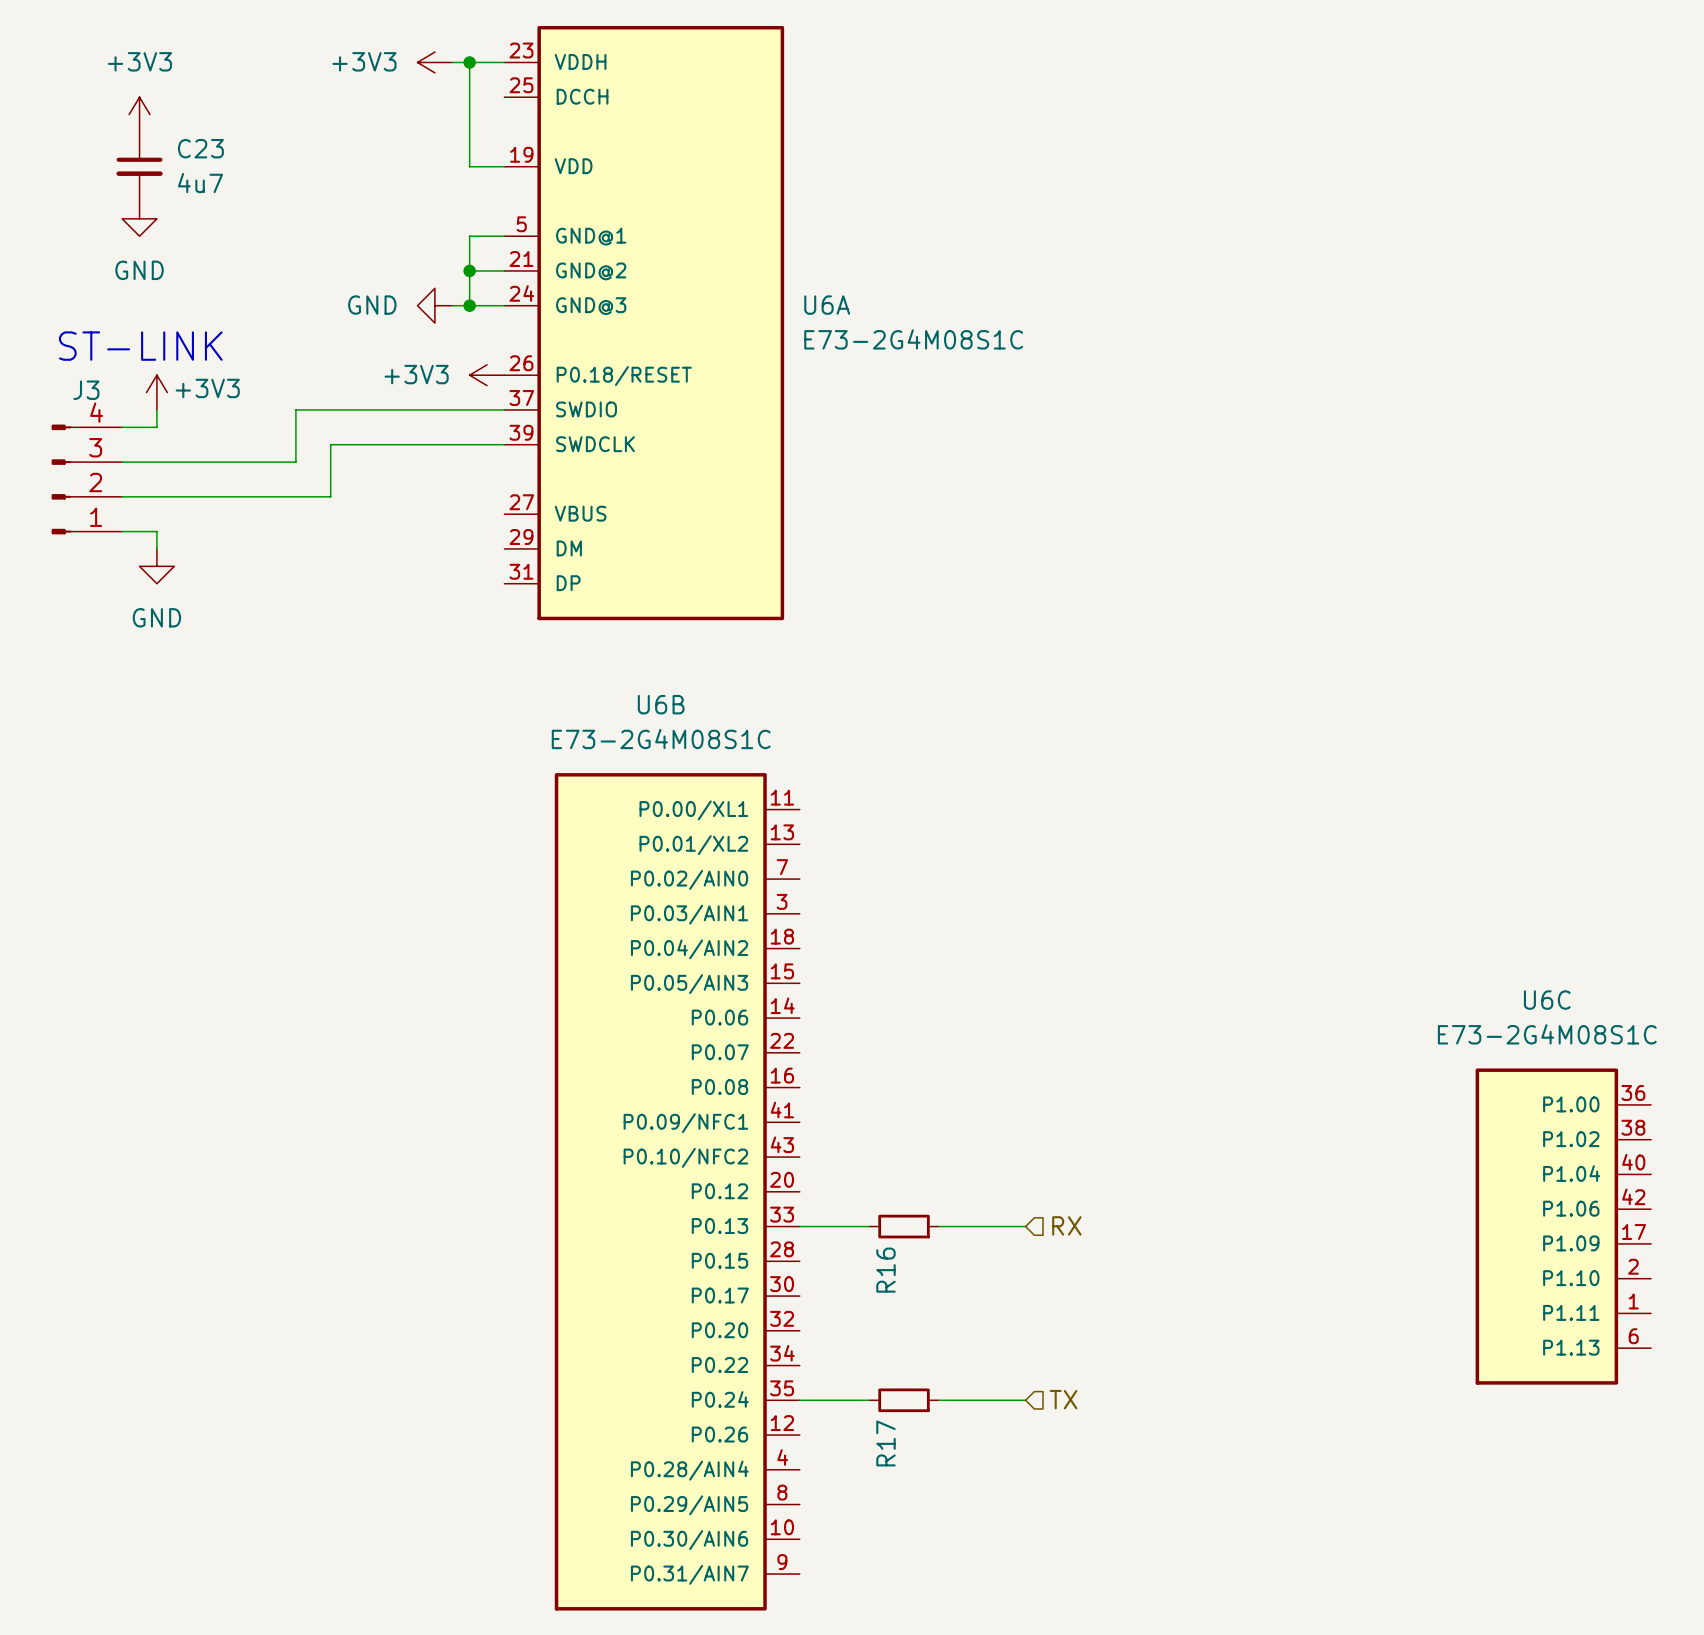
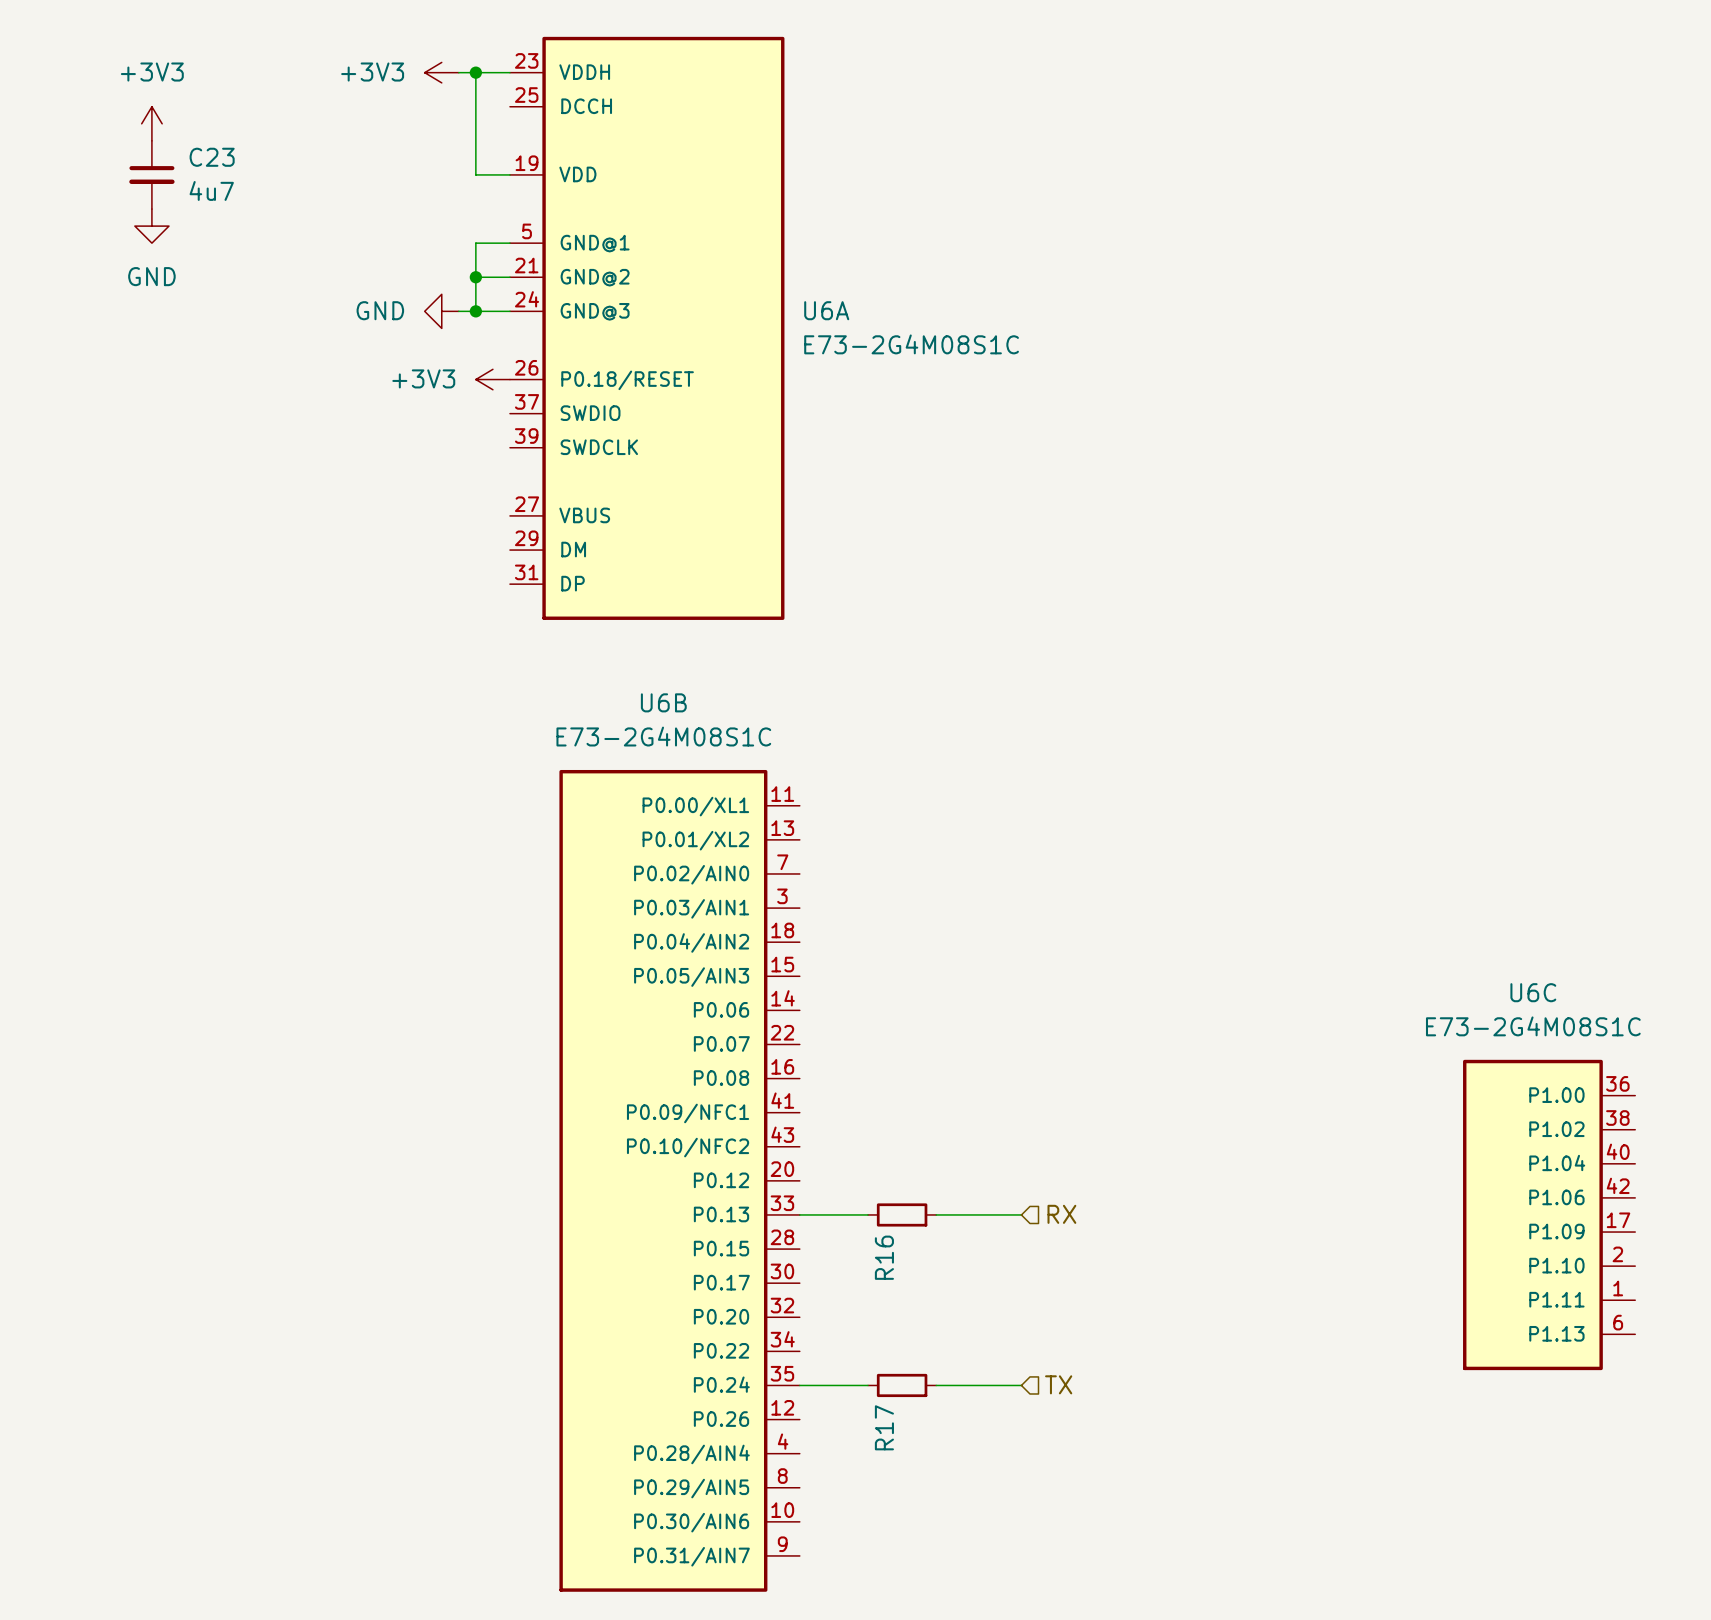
text: ST-LINK (140, 346) -> none
power symbol: +3V3 (156, 392) -> none
wire: (156, 409) (156, 427) (122, 427) -> none
wire: (504, 409) (295, 409) (295, 462) (122, 462) -> none
wire: (504, 444) (330, 444) (330, 496) (122, 496) -> none
J3: (86, 479) -> none
wire: (122, 531) (156, 531) (156, 548) -> none
power symbol: GND (156, 566) -> none

